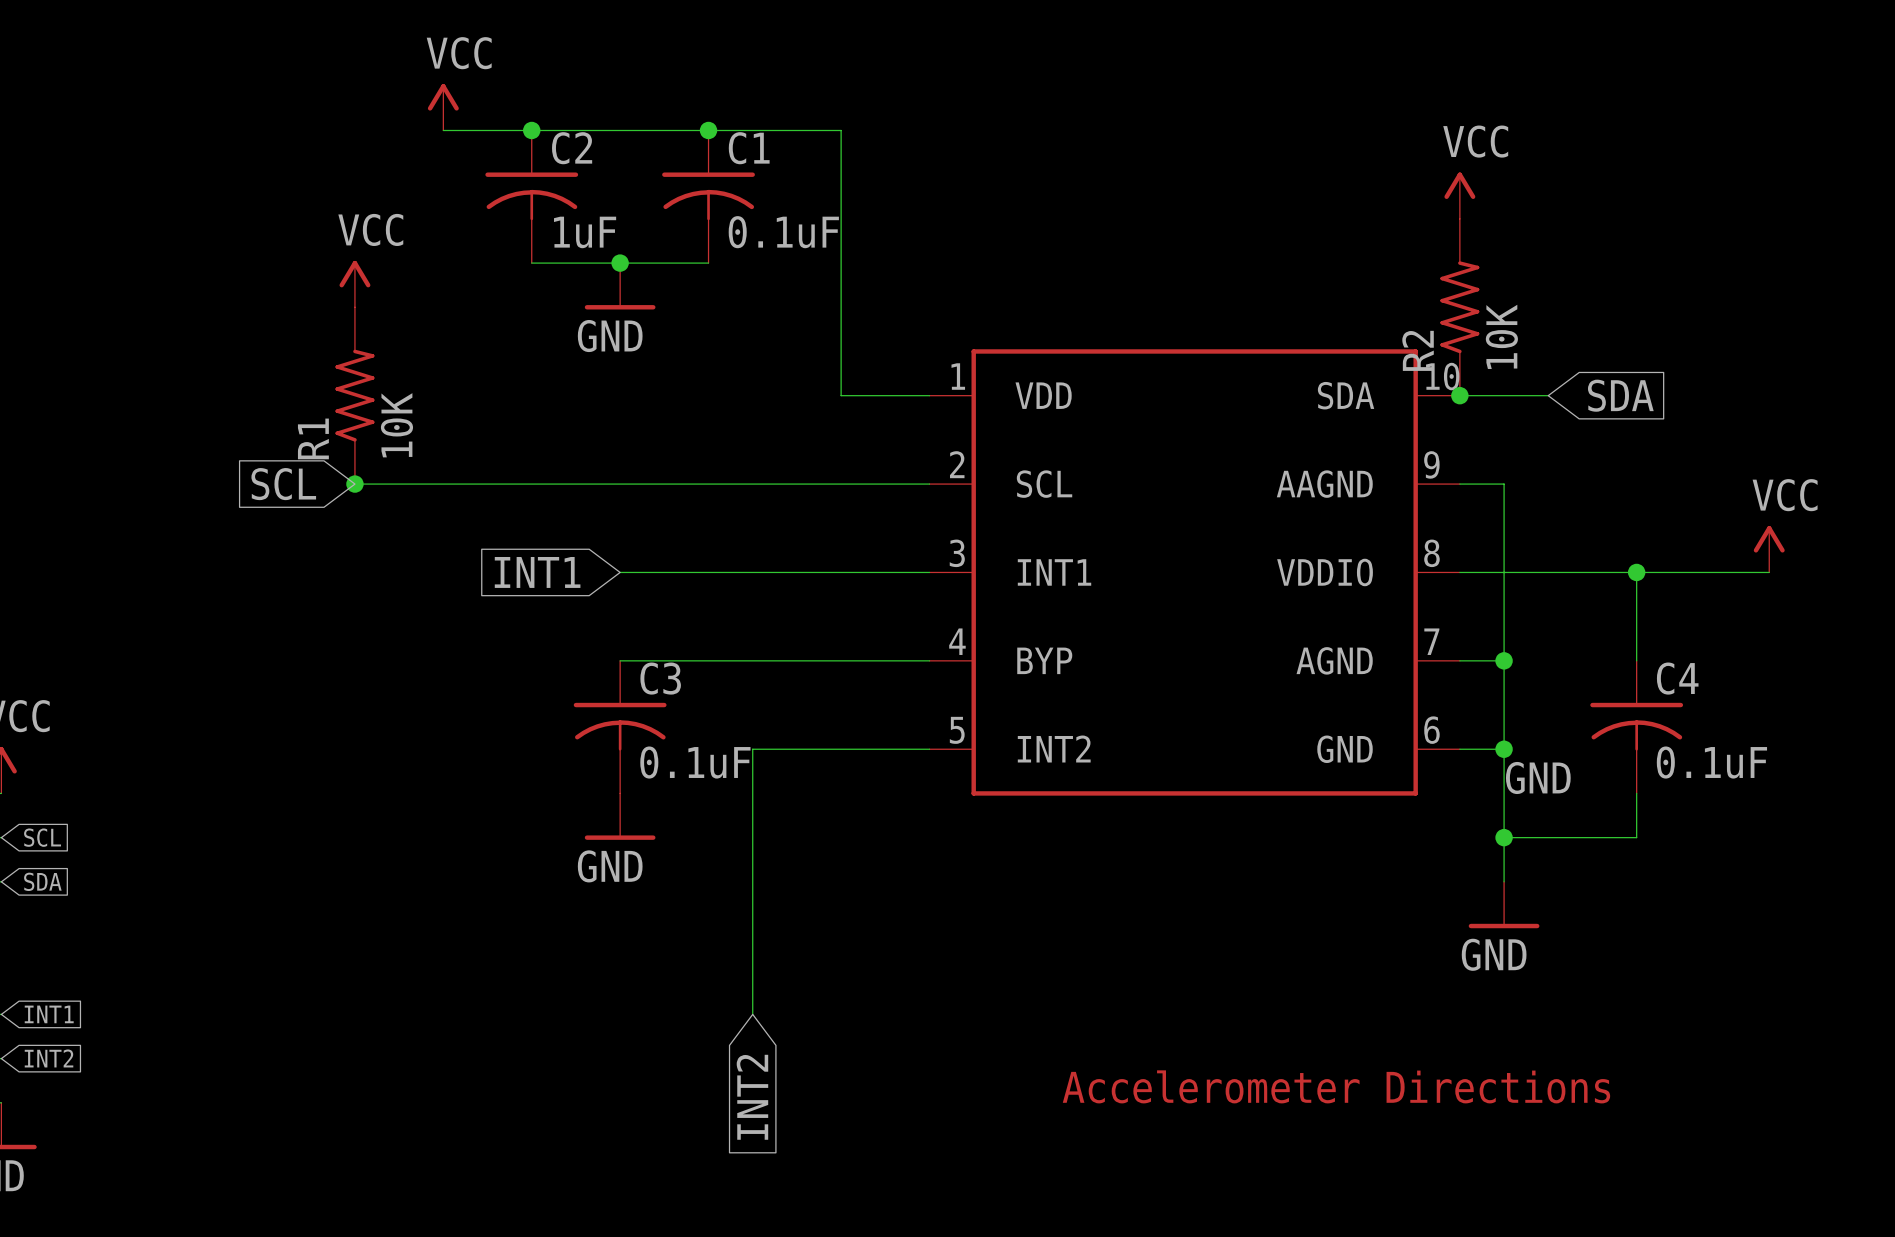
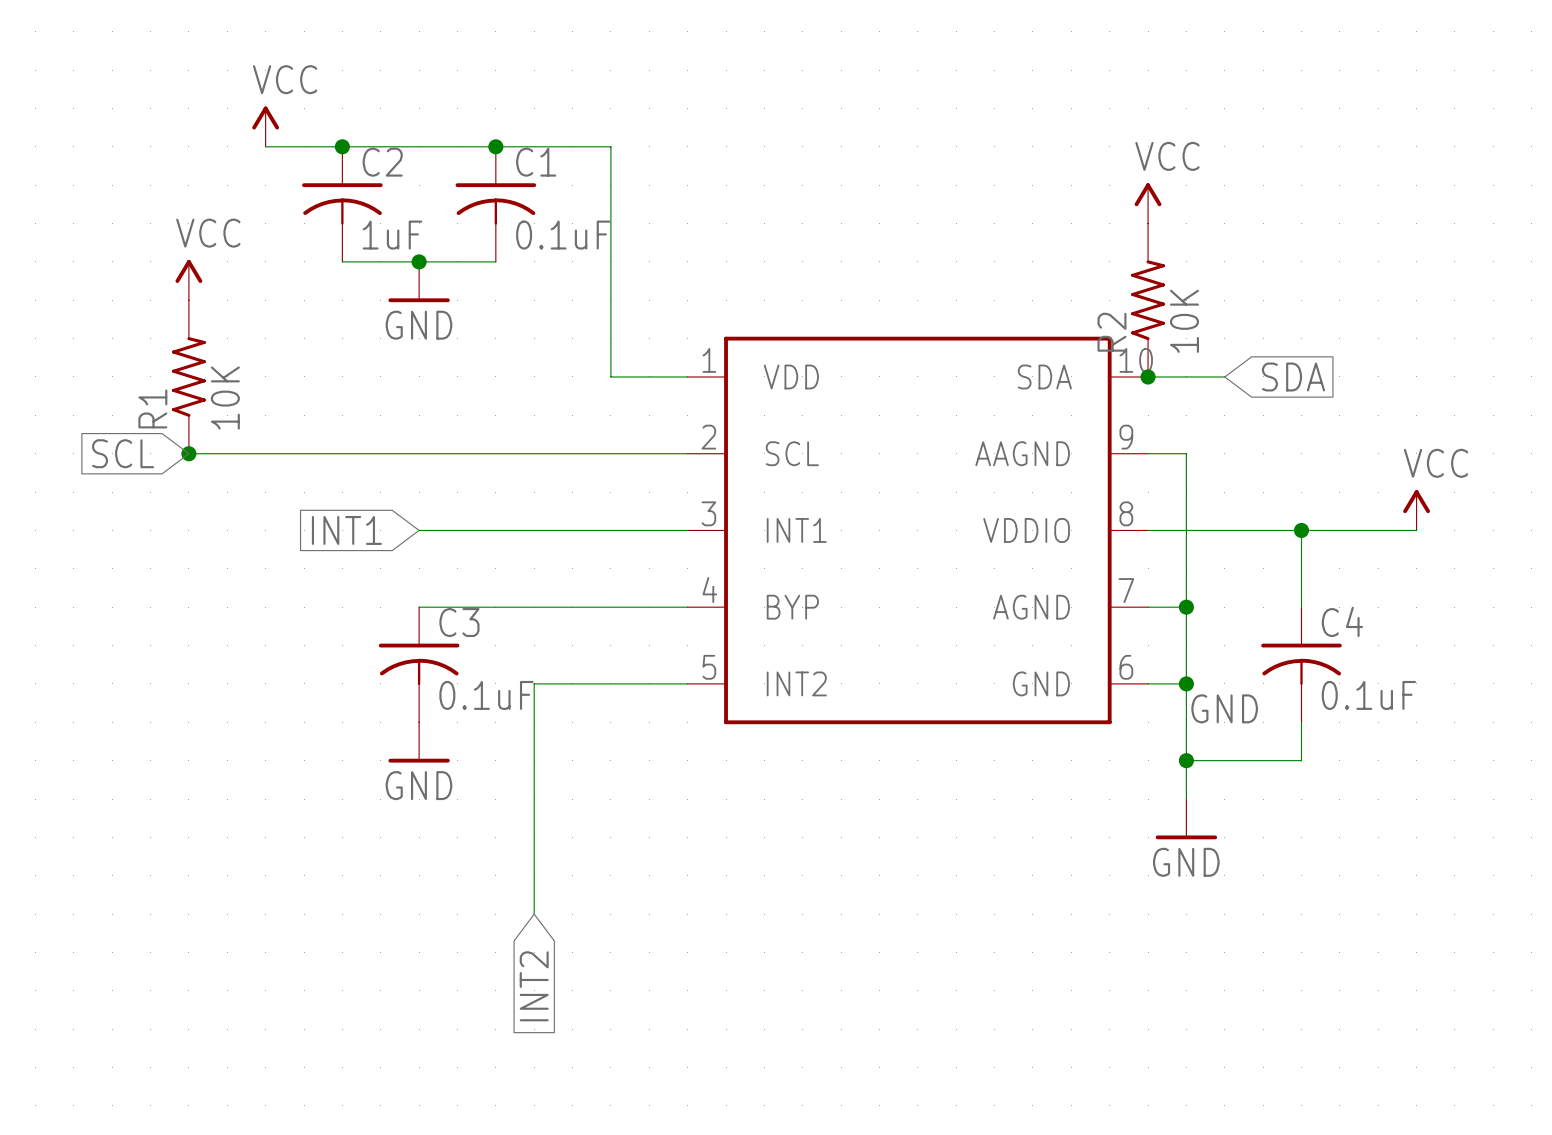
part: (1336, 1086) -> none

